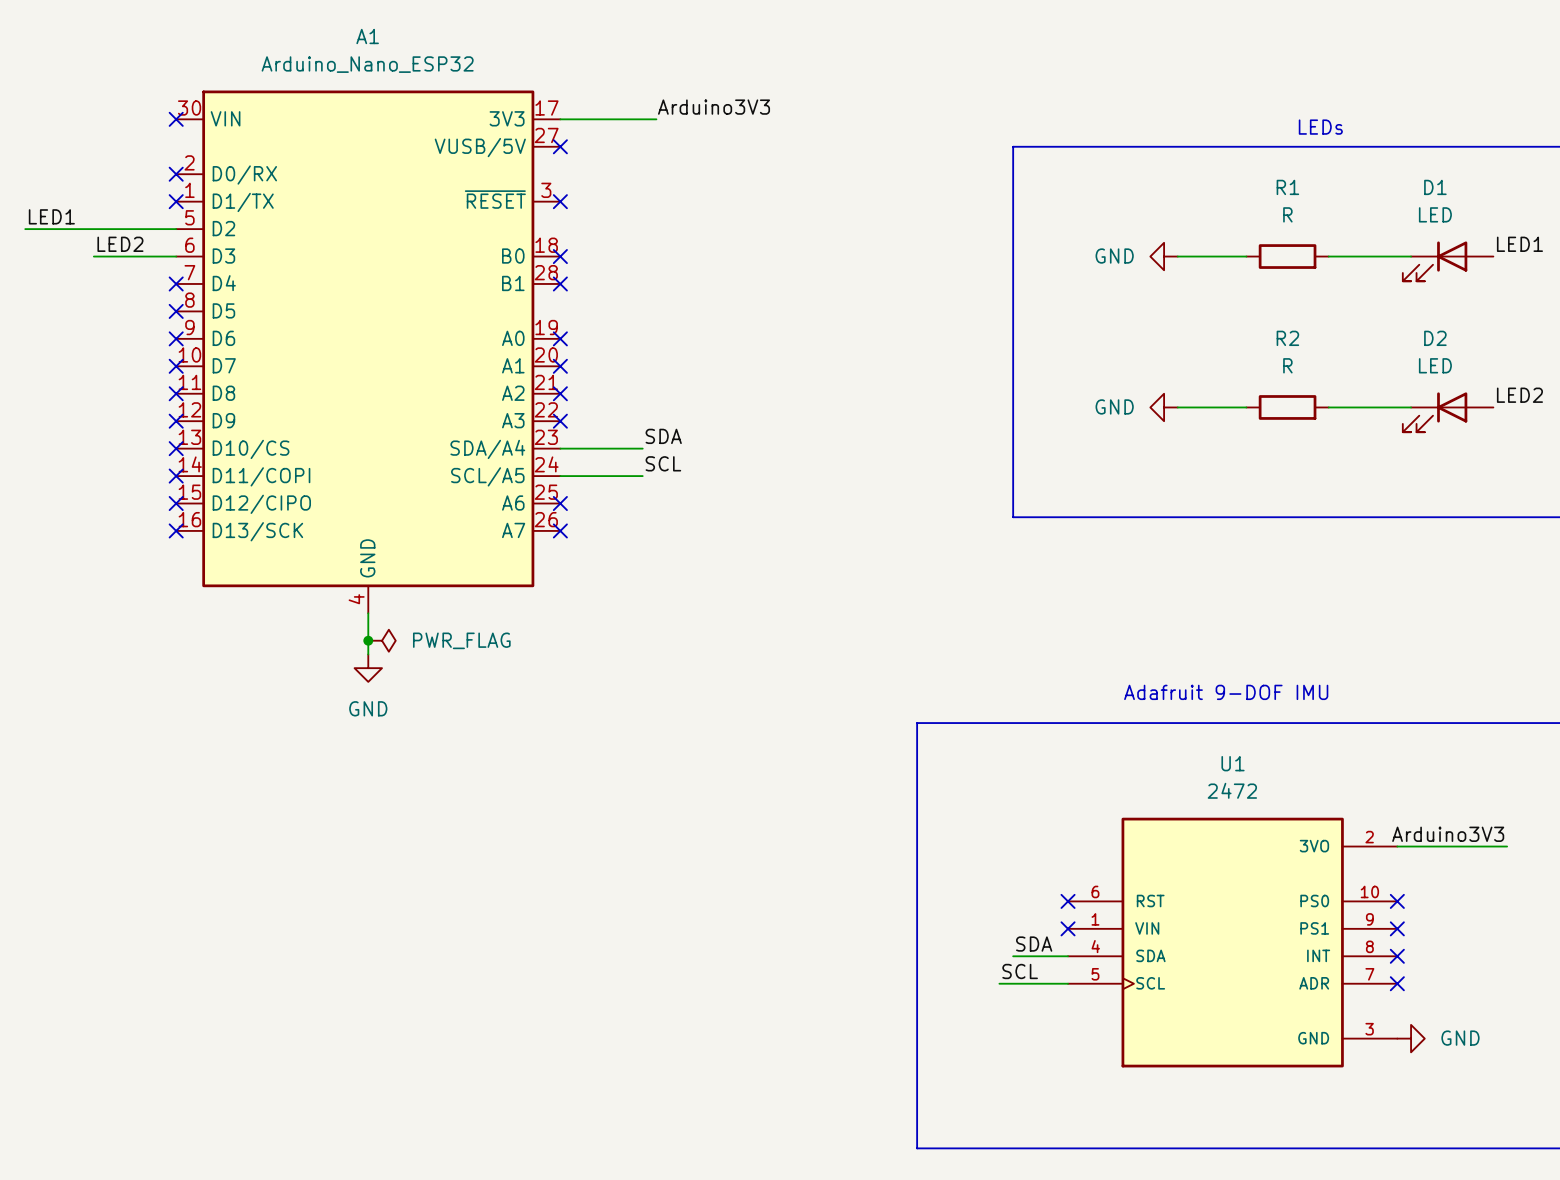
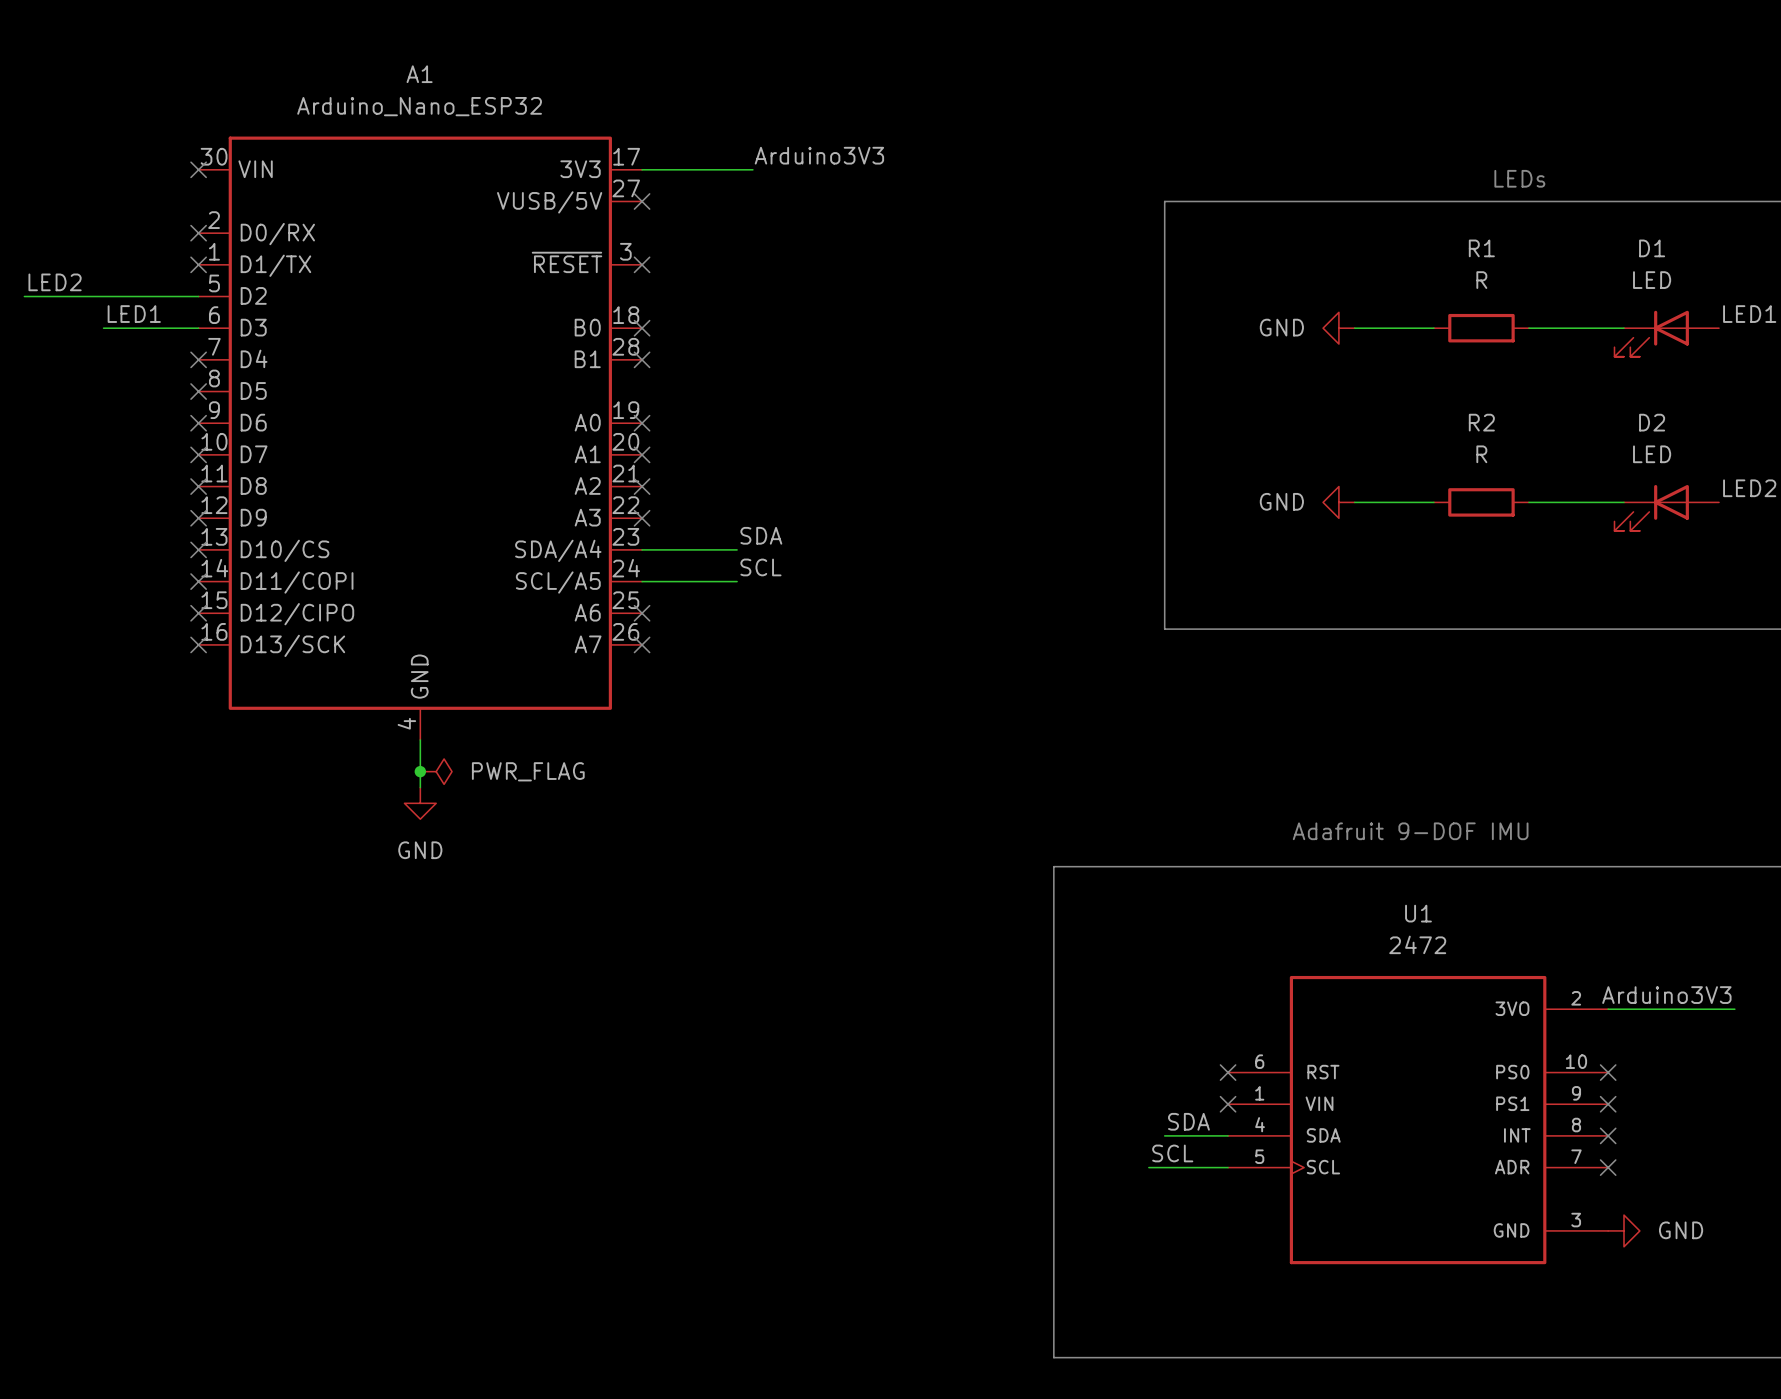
label: LED1 (51, 216) -> LED2 (55, 282)
label: LED2 (120, 244) -> LED1 (134, 314)

